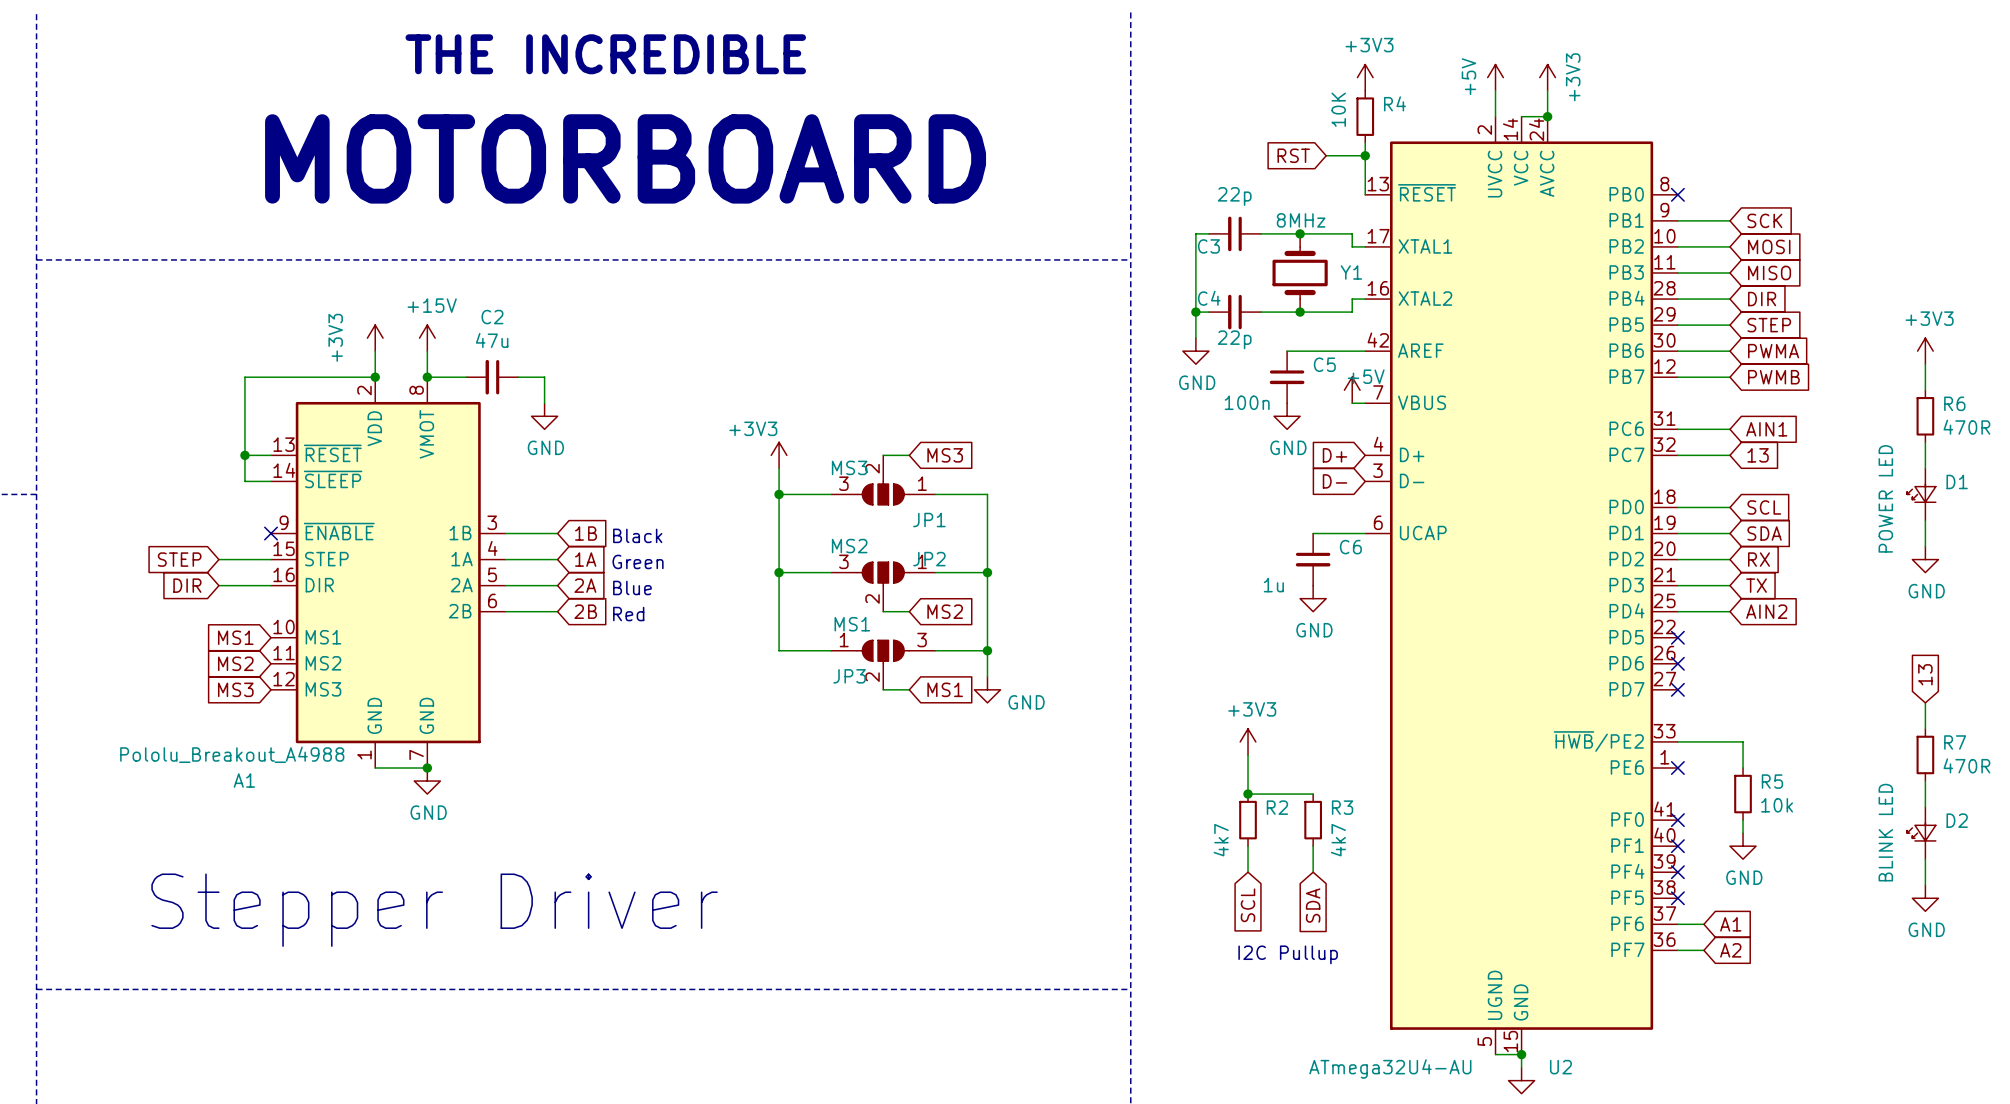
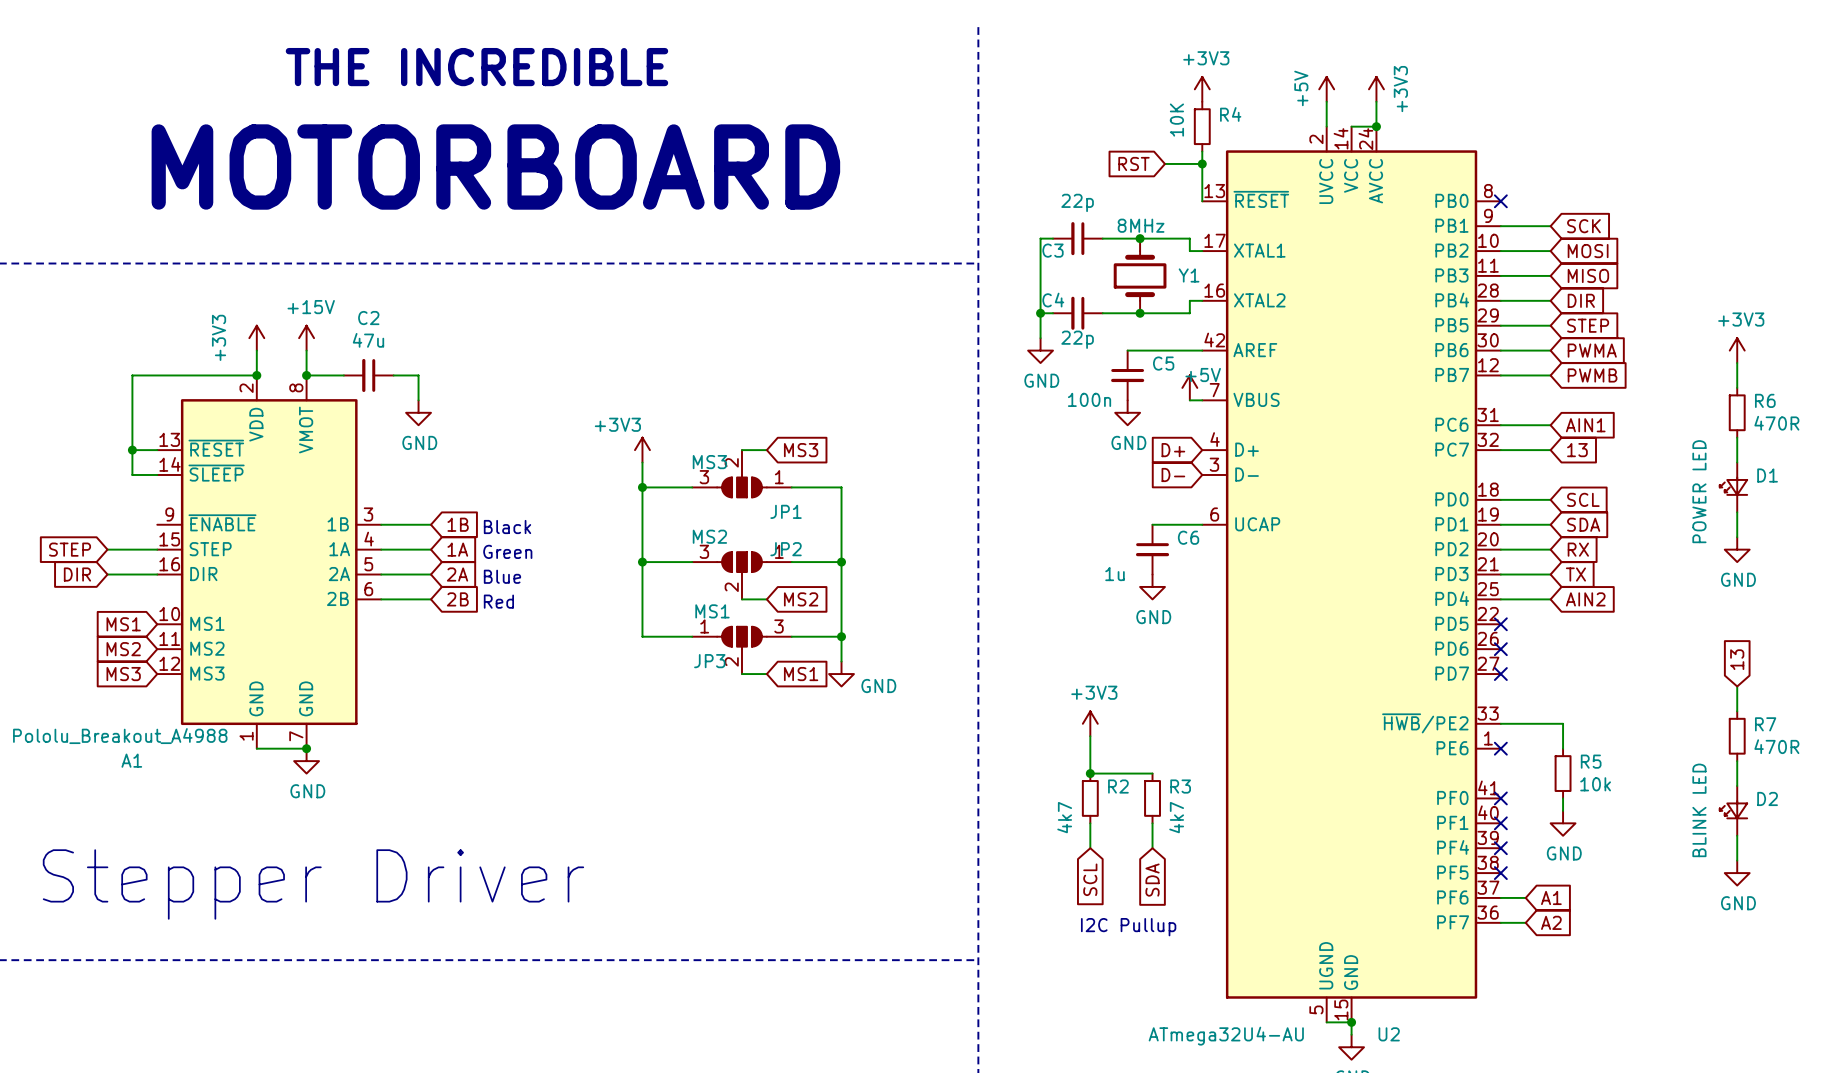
no-connect mark: (271, 533) -> none

